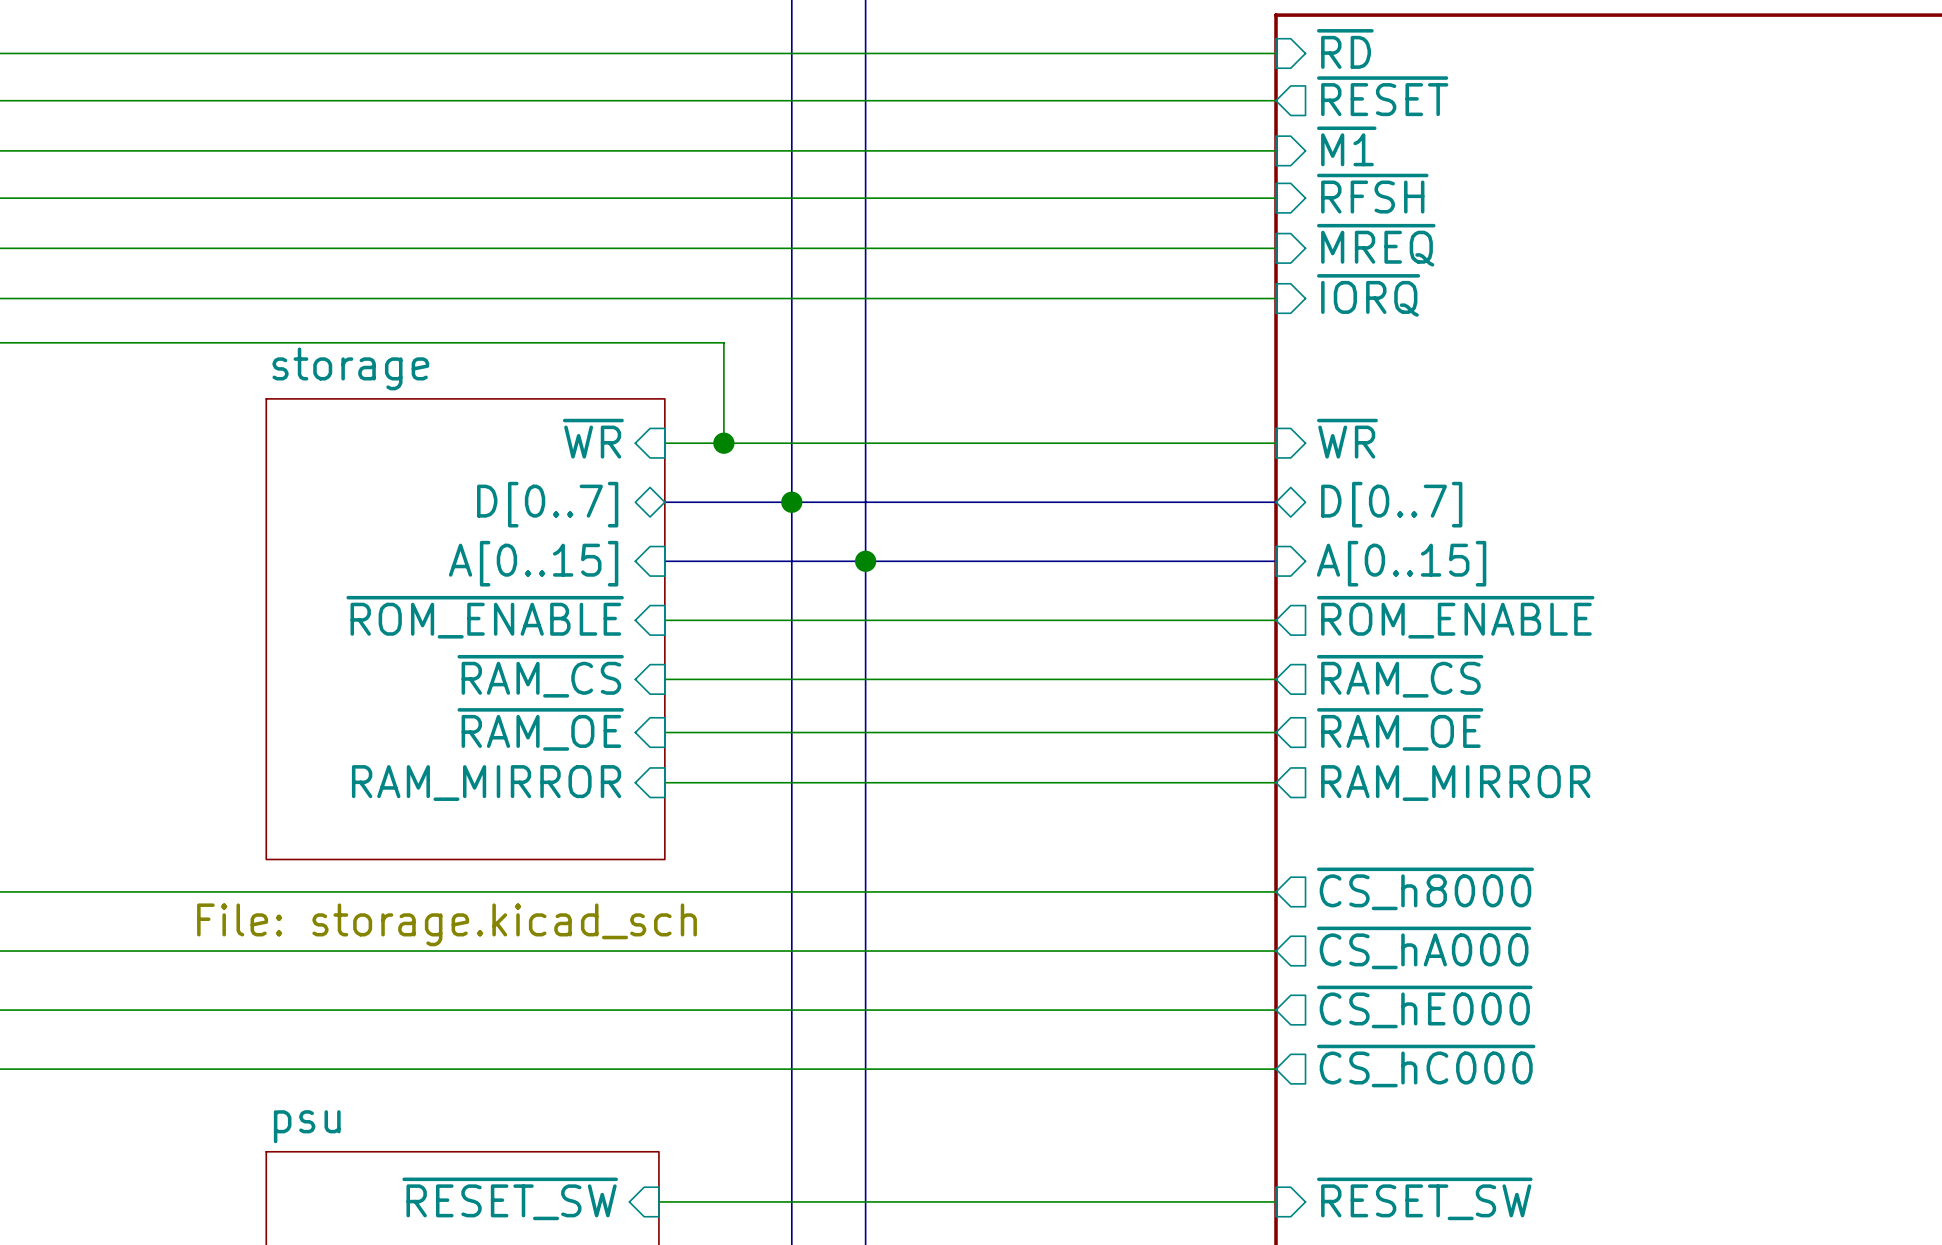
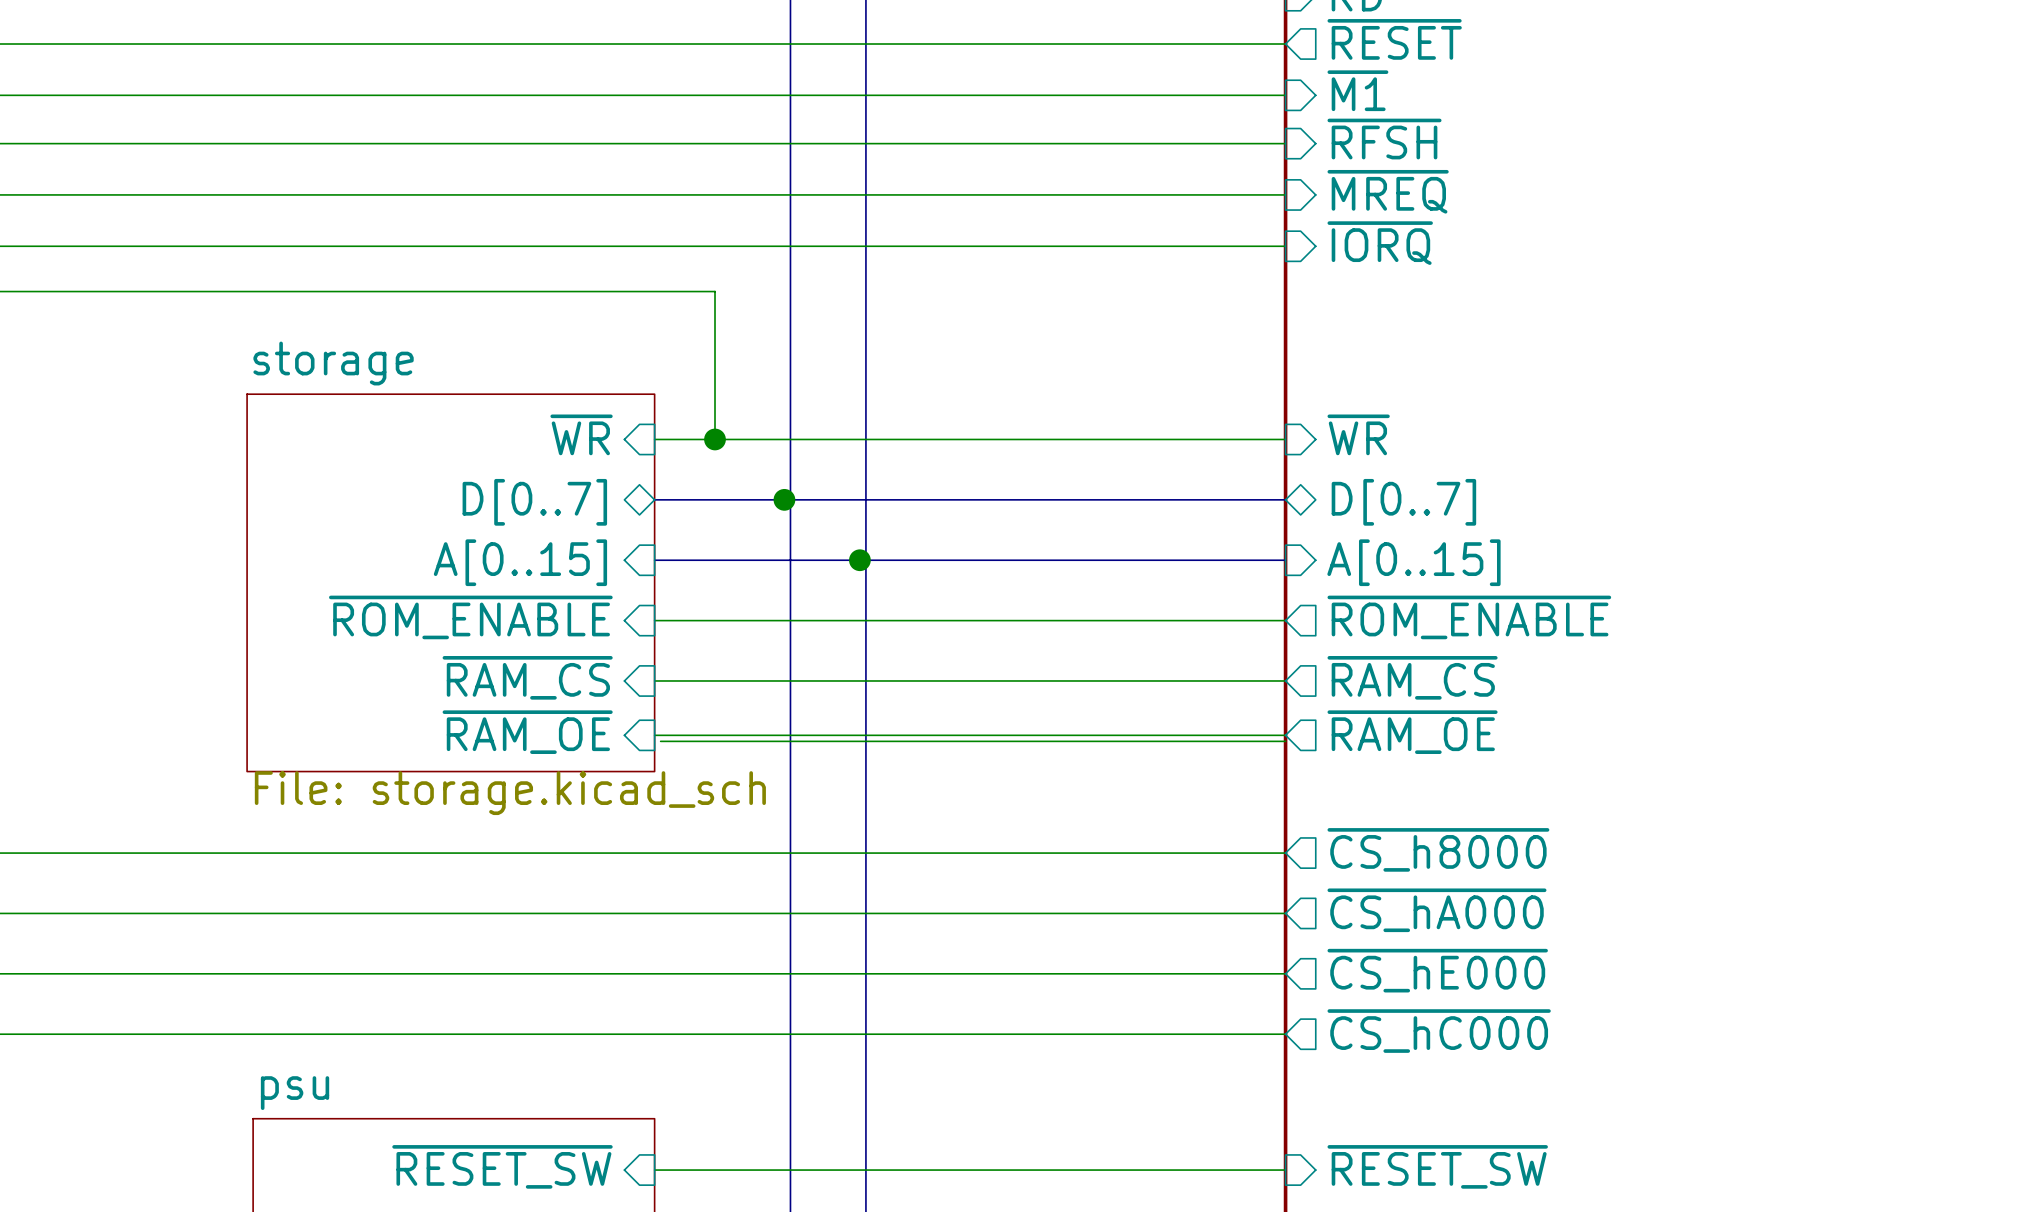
wire: (717, 342) (723, 342) (723, 443) -> (715, 291) (715, 439)
sheet storage shape: [266, 398, 665, 860] -> [247, 394, 655, 772]
sheet pin position: ~{WR} (593, 438) -> ~{WR} (581, 434)
sheet pin position: ~{WR} (1347, 438) -> ~{WR} (1358, 434)
wire: (664, 443) (1276, 443) -> none
junction: (723, 443) -> none
wire: none -> (654, 439) (1285, 439)
junction: none -> (715, 439)
bus: (664, 502) (1276, 502) -> none
junction: (791, 502) -> none
sheet pin position: D[0..7] (547, 504) -> D[0..7] (534, 502)
sheet pin position: D[0..7] (1391, 504) -> D[0..7] (1403, 502)
bus: none -> (654, 499) (1285, 499)
junction: none -> (784, 499)
bus: (664, 561) (1276, 561) -> none
junction: (865, 561) -> none
sheet pin position: A[0..15] (533, 563) -> A[0..15] (520, 562)
sheet pin position: A[0..15] (1401, 563) -> A[0..15] (1413, 562)
bus: none -> (654, 560) (1285, 560)
junction: none -> (859, 560)
sheet pin position: ~{ROM_ENABLE} (485, 617) -> ~{ROM_ENABLE} (470, 617)
sheet pin position: ~{ROM_ENABLE} (1455, 617) -> ~{ROM_ENABLE} (1469, 617)
wire: (664, 620) (1276, 620) -> none
wire: none -> (654, 620) (1285, 620)
sheet pin position: ~{RAM_CS} (540, 676) -> ~{RAM_CS} (527, 677)
sheet pin position: ~{RAM_CS} (1400, 676) -> ~{RAM_CS} (1412, 677)
wire: (664, 679) (1276, 679) -> none
wire: none -> (654, 680) (1285, 680)
sheet pin position: ~{RAM_OE} (540, 729) -> ~{RAM_OE} (527, 732)
sheet pin position: ~{RAM_OE} (1400, 729) -> ~{RAM_OE} (1412, 732)
wire: (664, 732) (1276, 732) -> none
wire: none -> (654, 735) (1285, 735)
sheet pin: RAM_MIRROR (486, 783) -> none
sheet pin: RAM_MIRROR (1455, 783) -> none
sheet storage value position: File: storage.kicad_sch (447, 924) -> File: storage.kicad_sch (510, 793)

